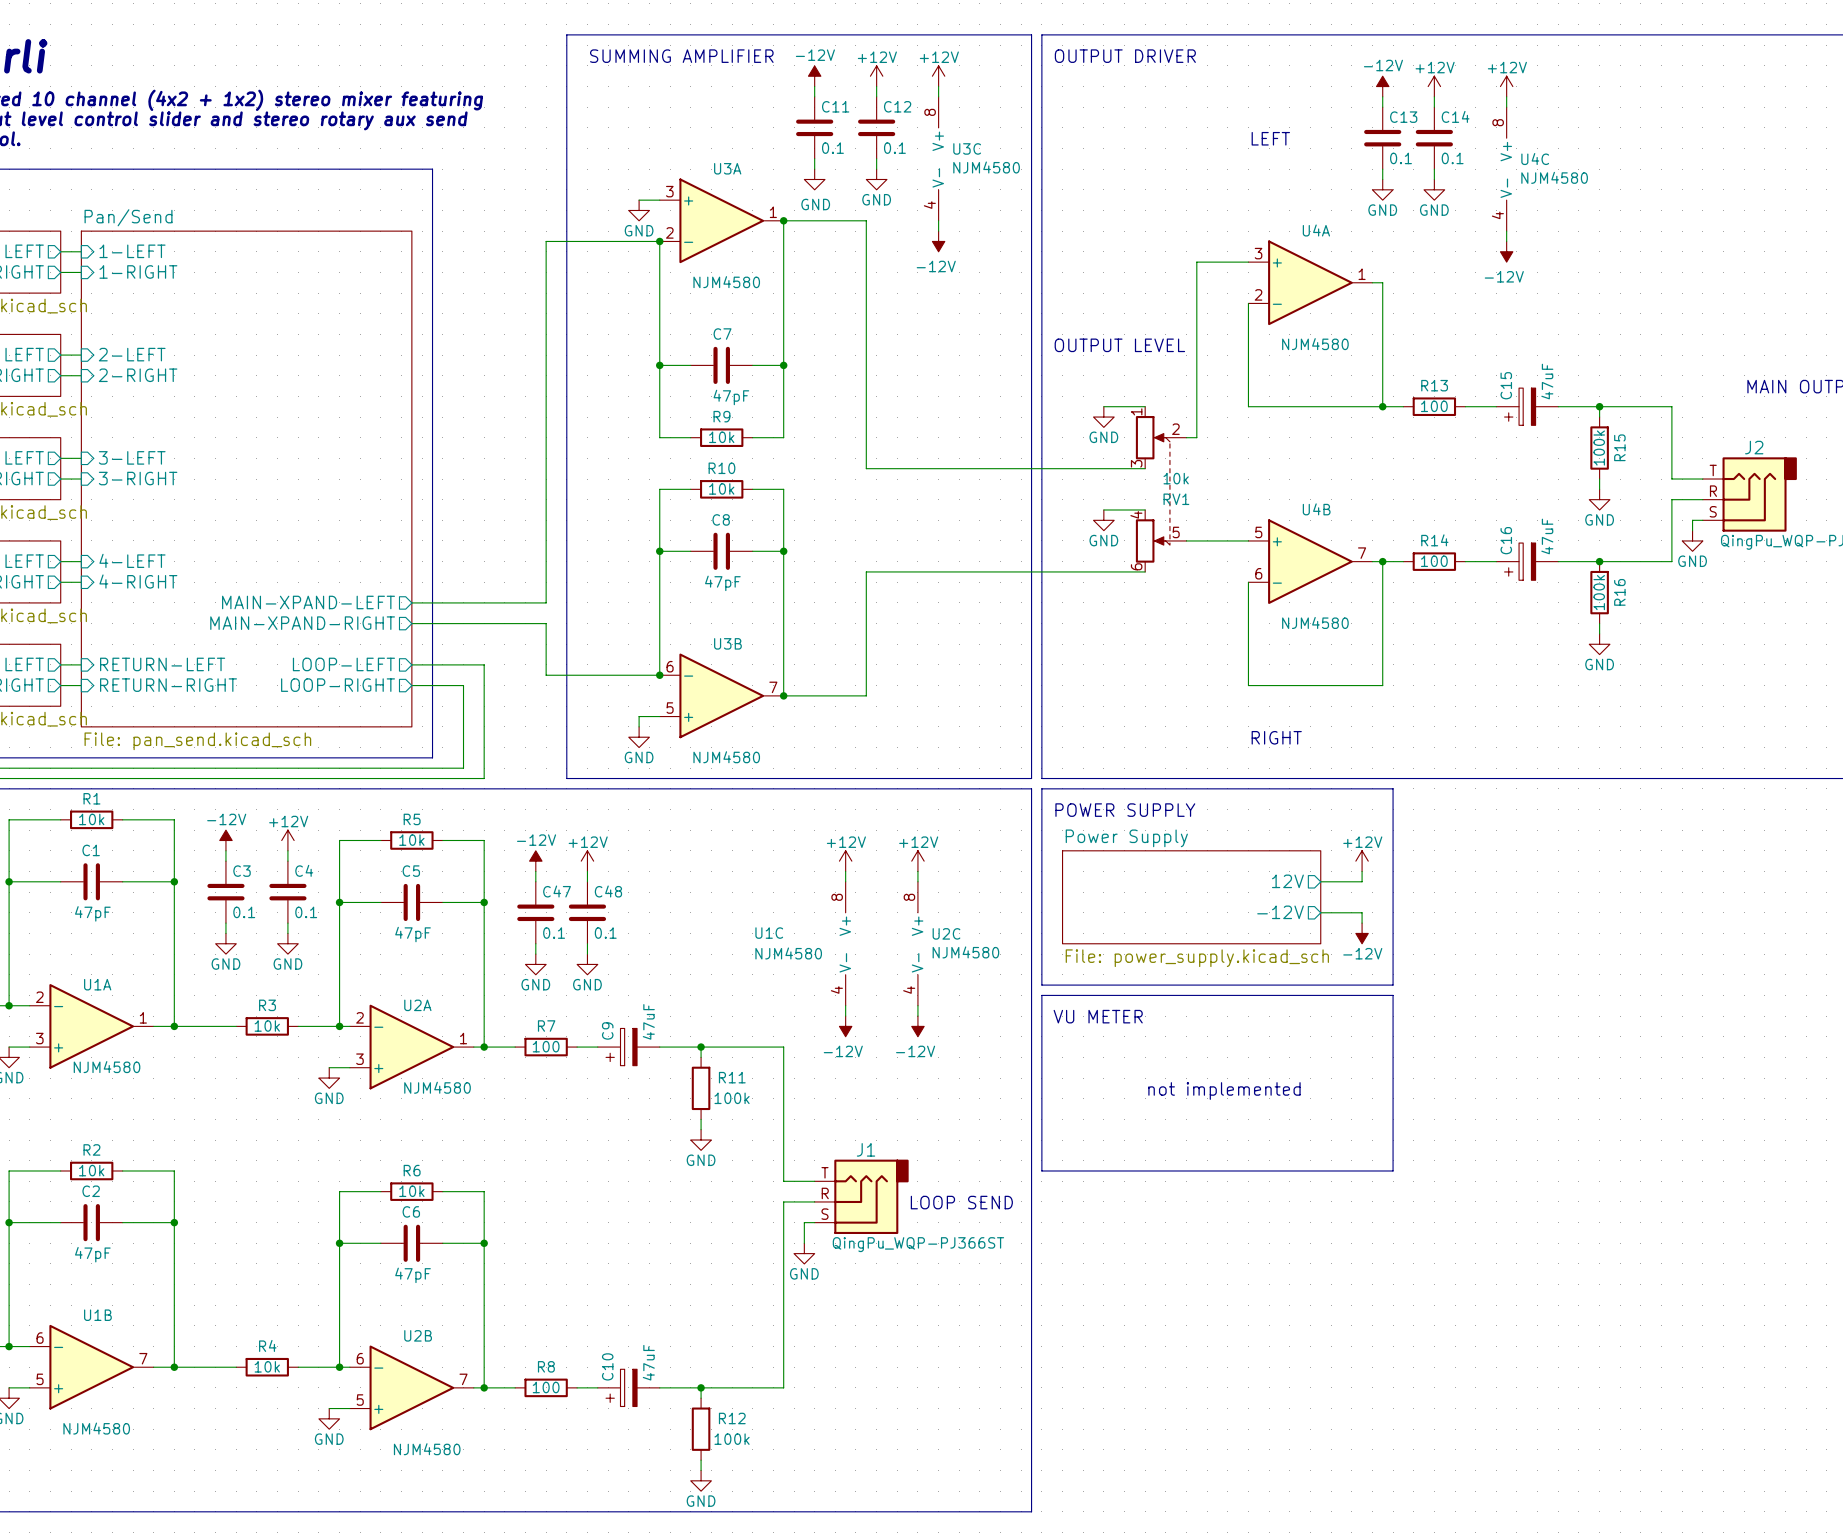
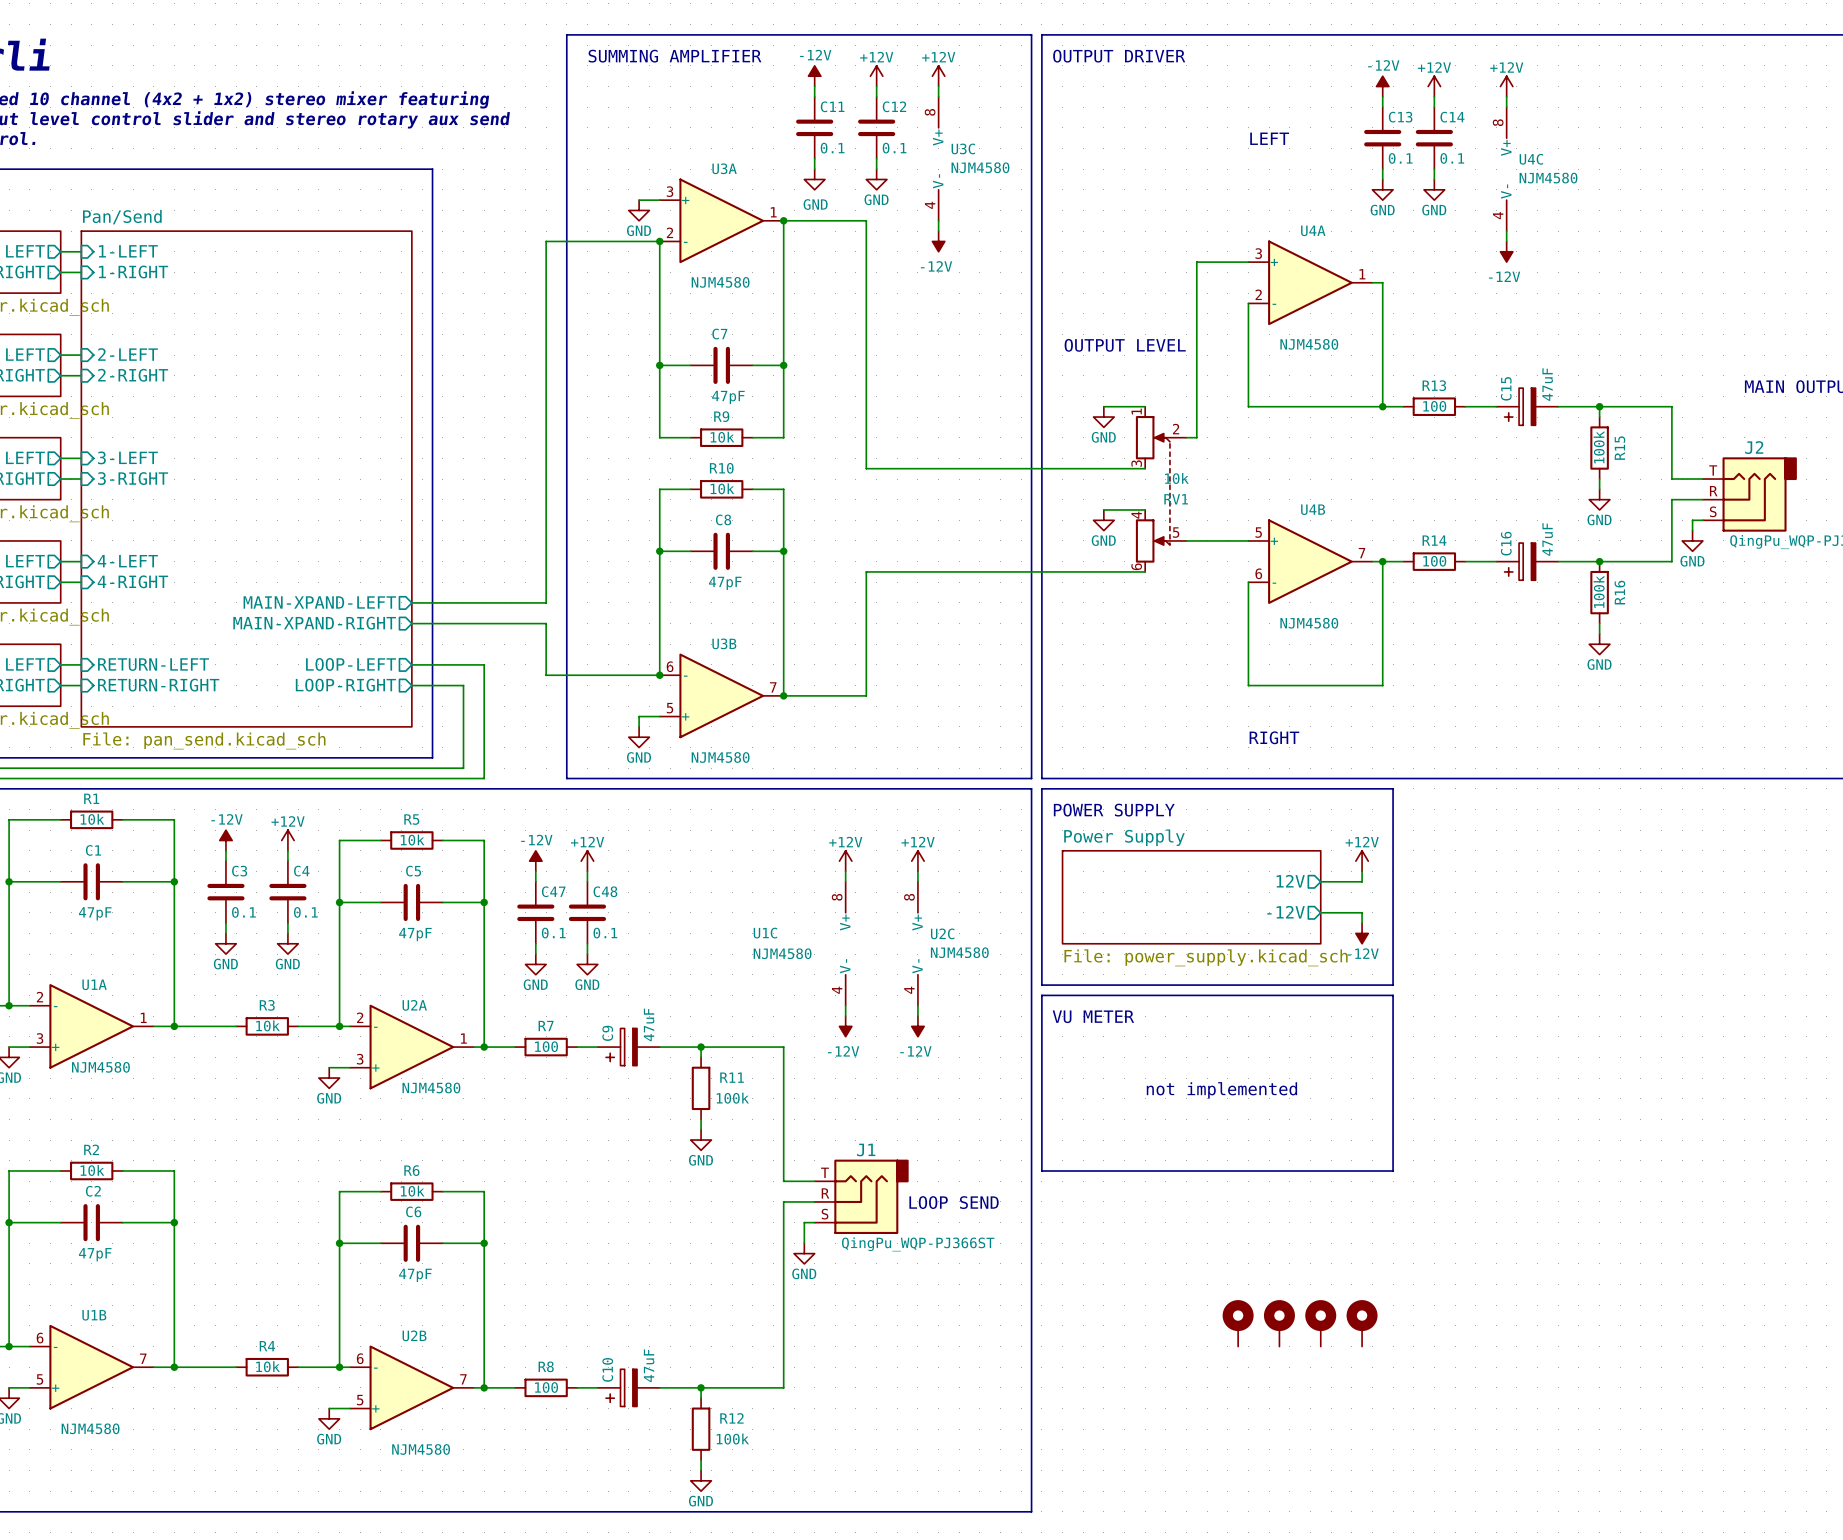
part: none -> (1238, 1323)
part: none -> (1279, 1323)
part: none -> (1320, 1323)
part: none -> (1362, 1323)

